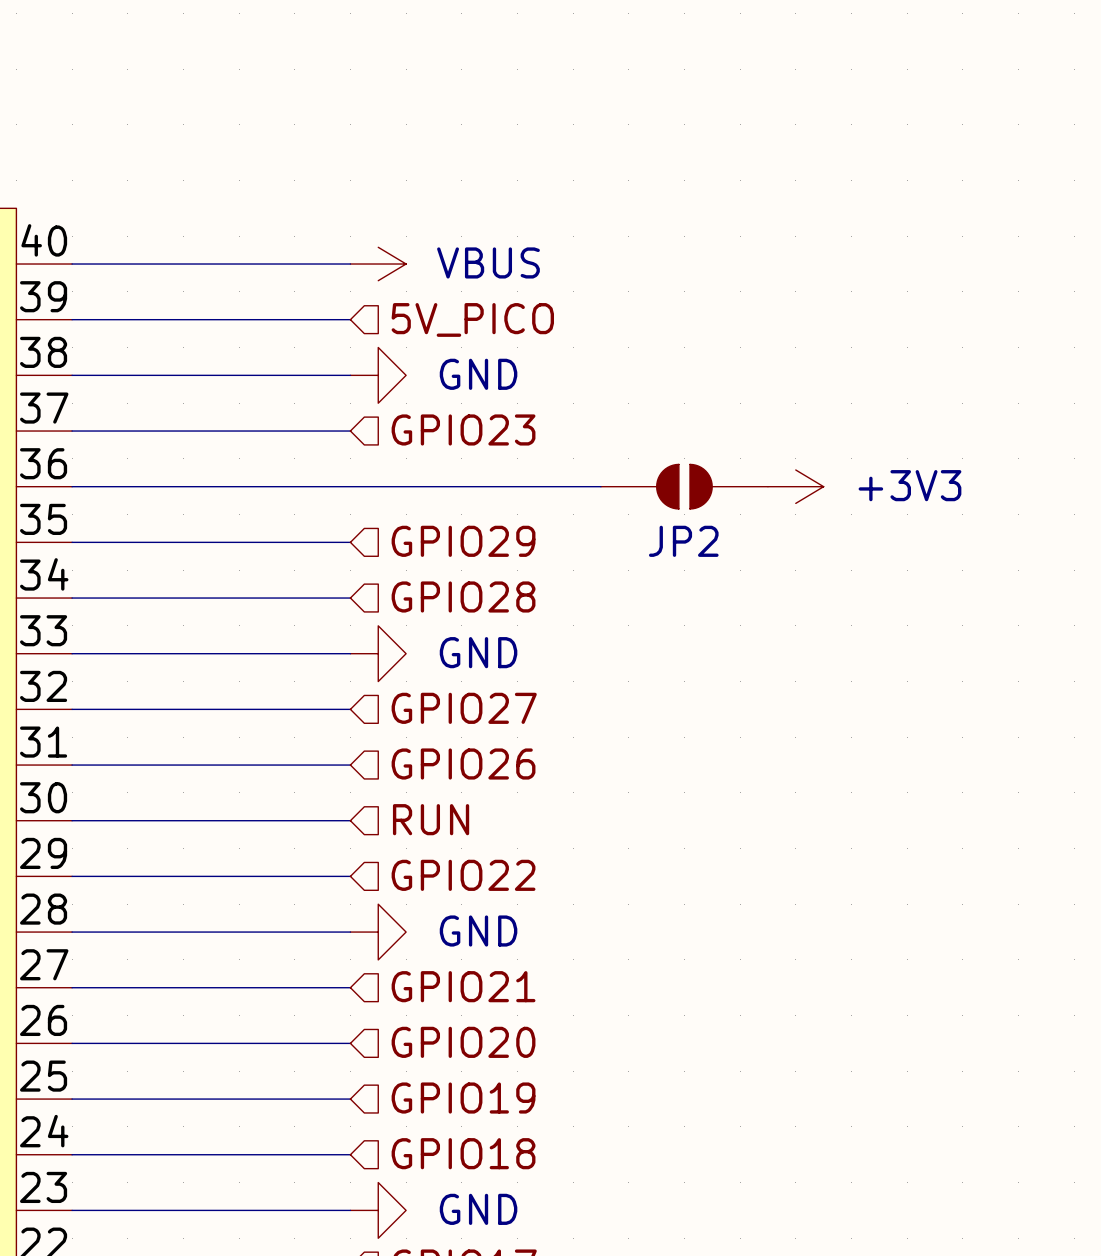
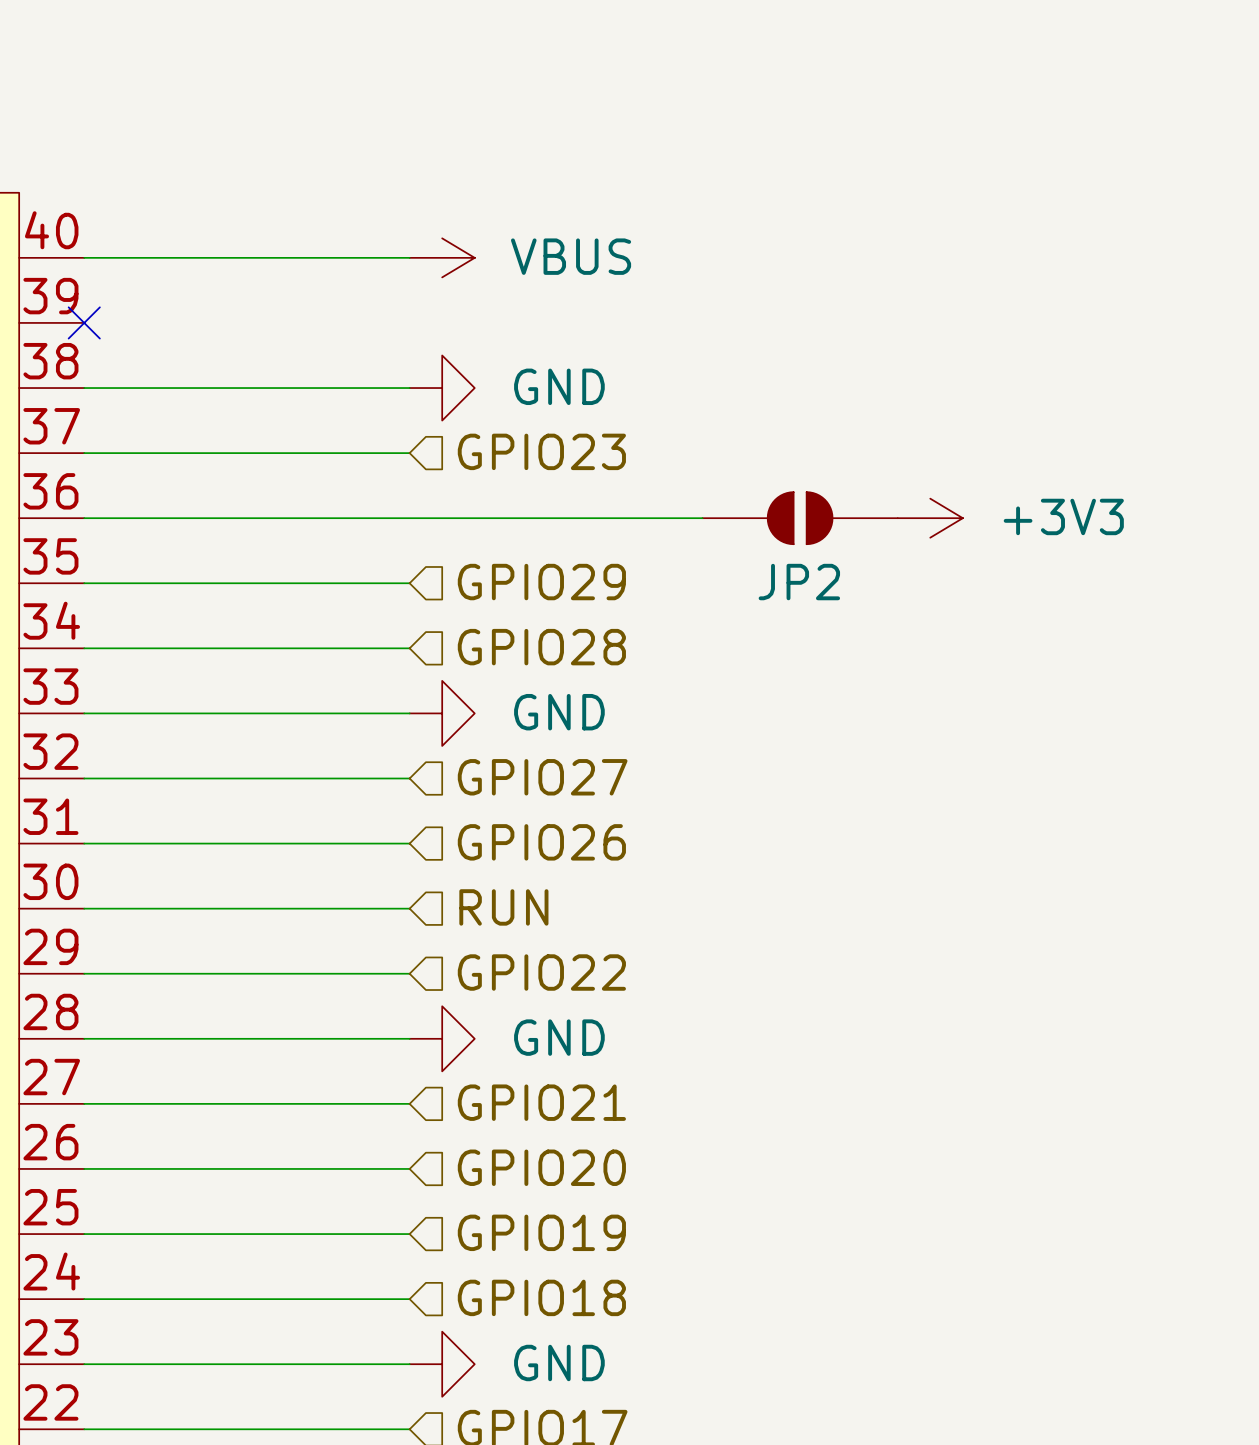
wire: (72, 319) (350, 319) -> none
no-connect mark: none -> (84, 322)
hierarchical label: 5V_PICO (472, 319) -> none

